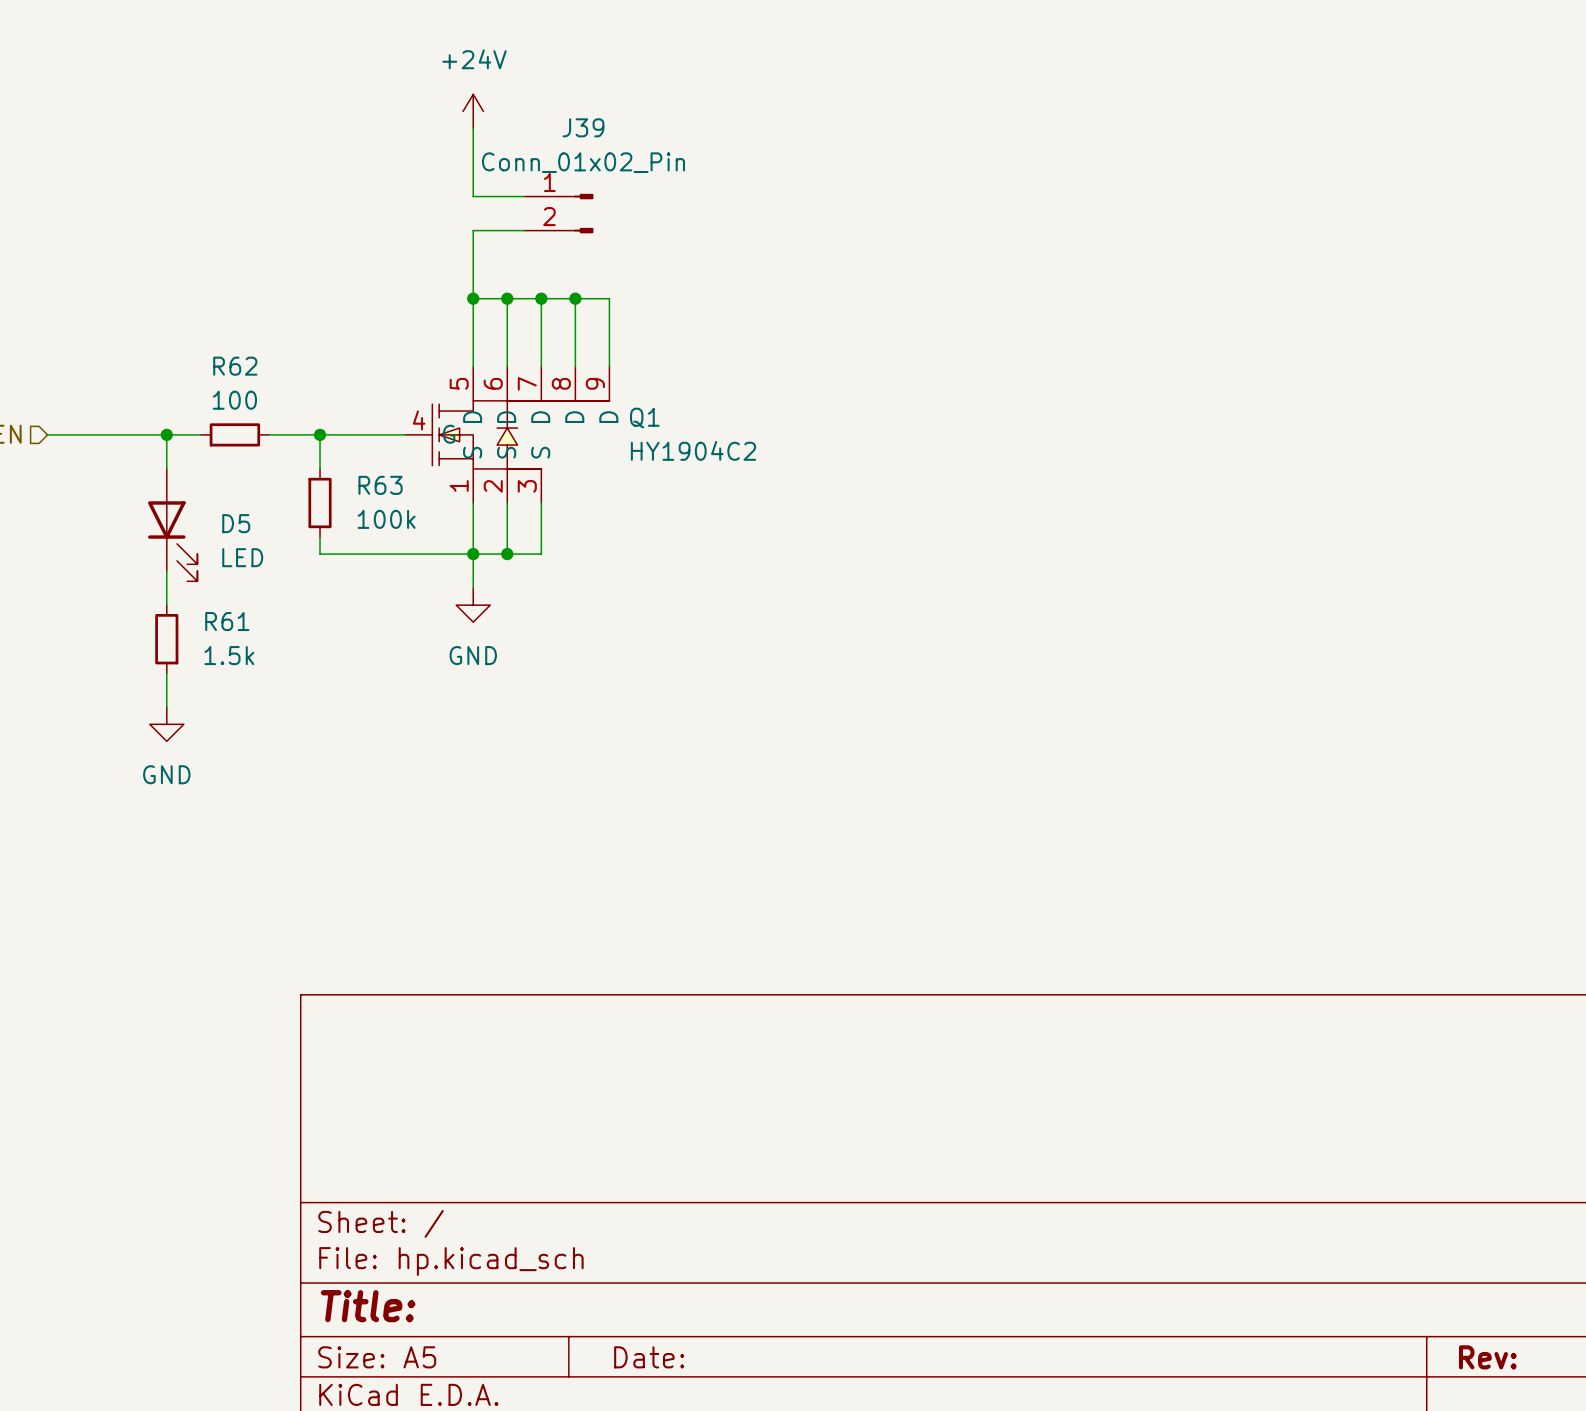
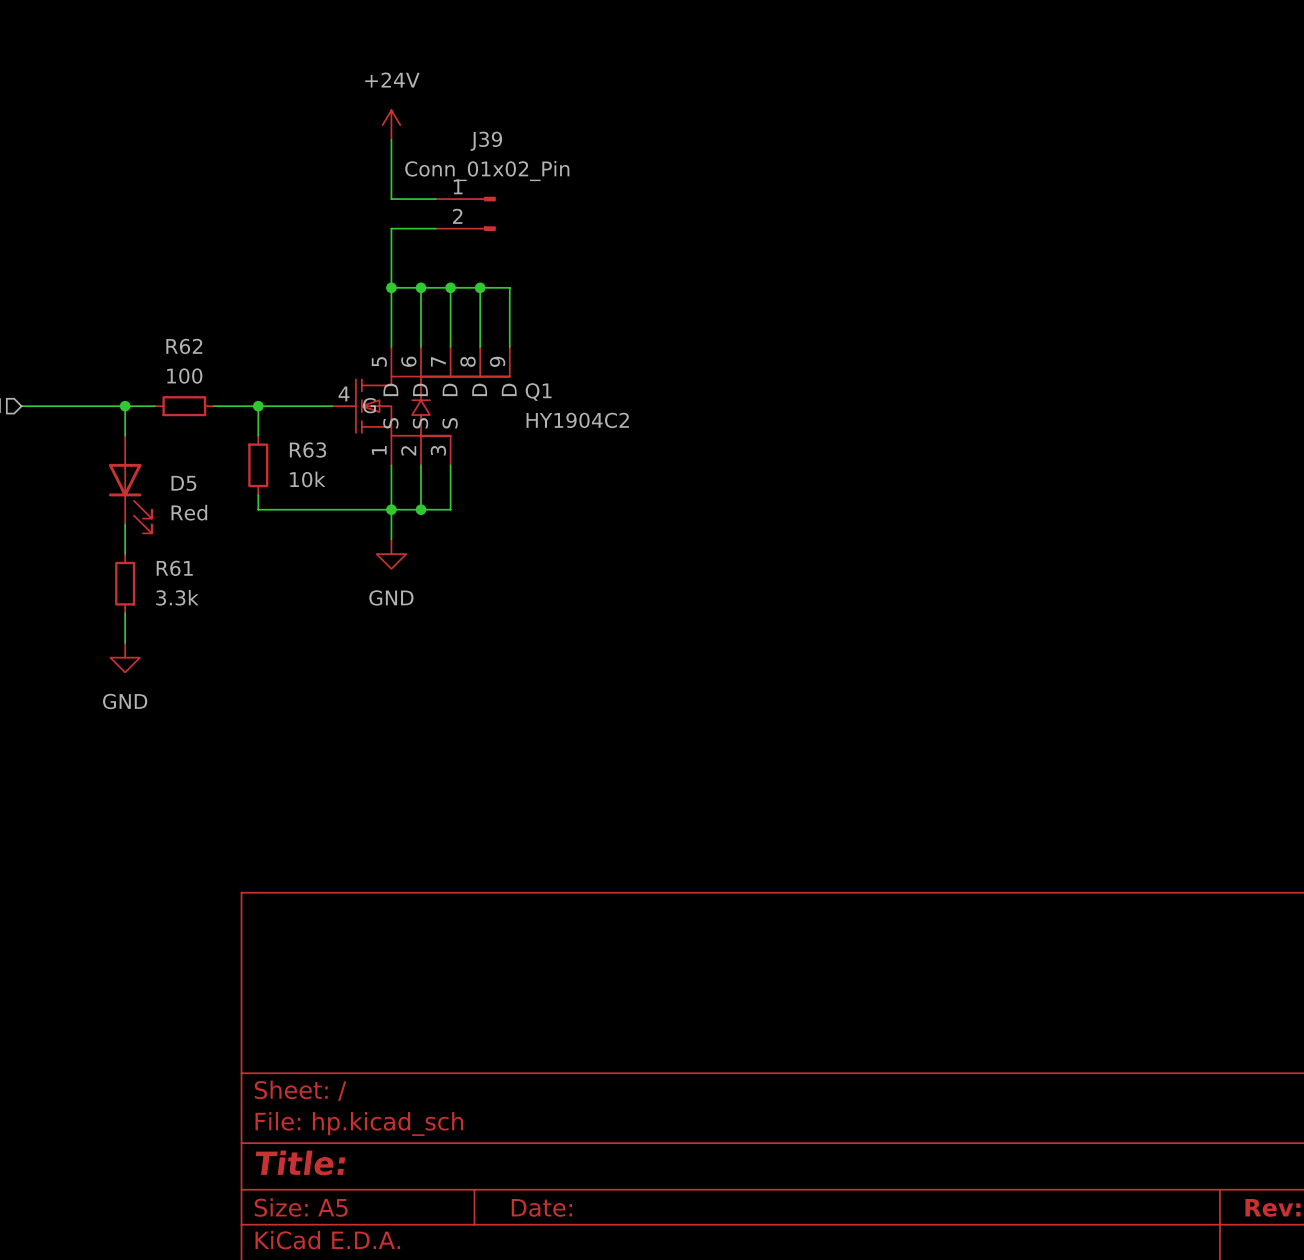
R63 value: 100k (386, 519) -> 10k (307, 479)
D5 value: LED (242, 557) -> Red (189, 512)
R61 value: 1.5k (229, 655) -> 3.3k (177, 597)

